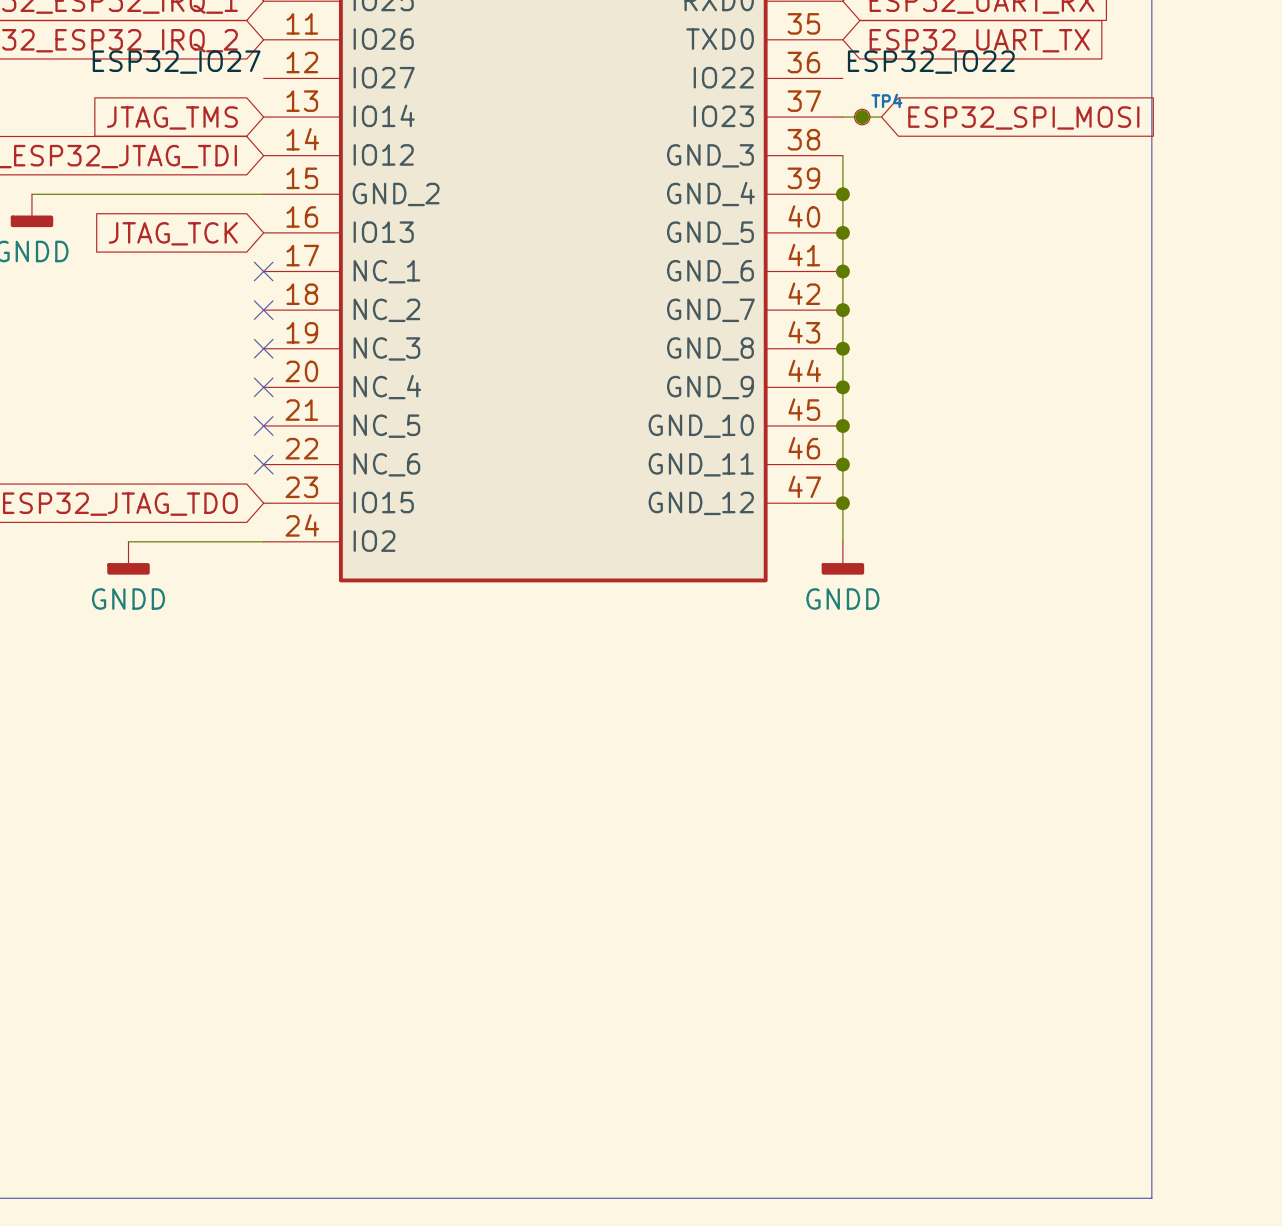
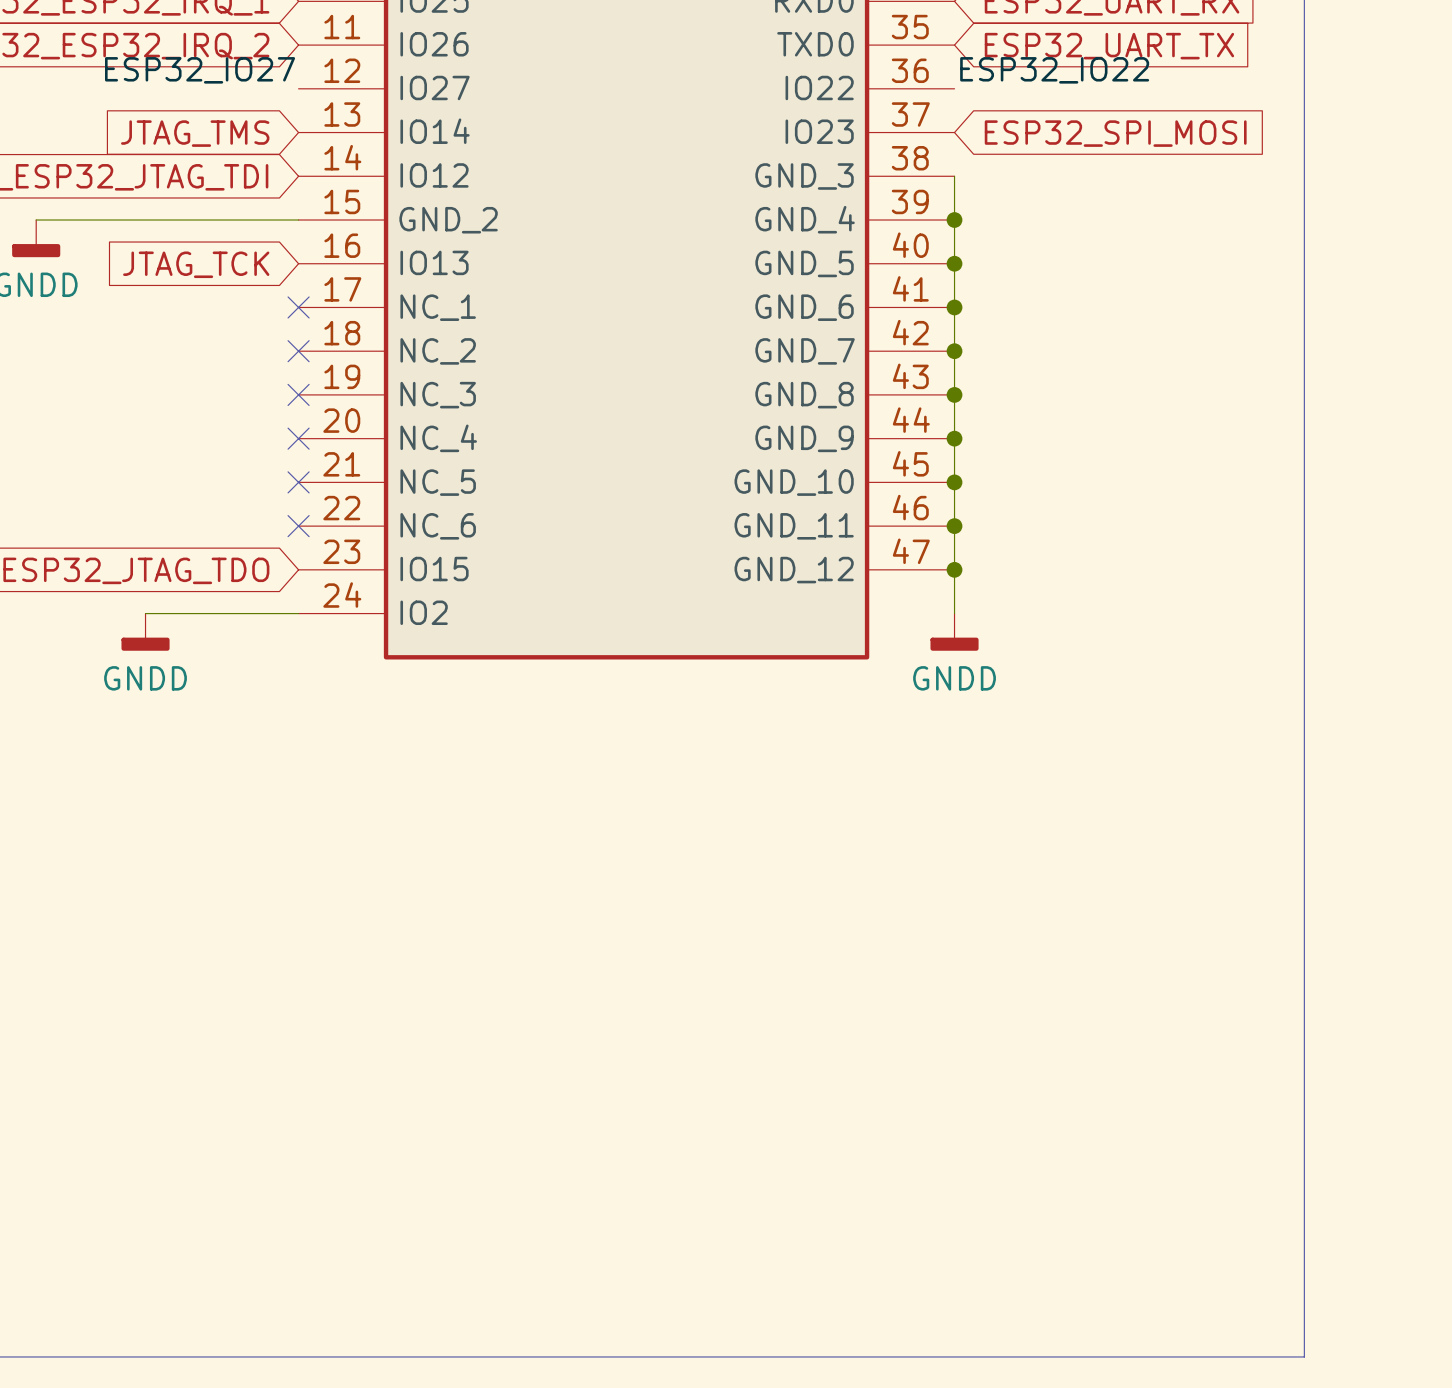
wire: (842, 117) (881, 117) -> none
junction: (862, 117) -> none
TP4: (862, 117) -> none
global label position: ESP32_SPI_MOSI (1023, 117) -> ESP32_SPI_MOSI (1115, 133)

